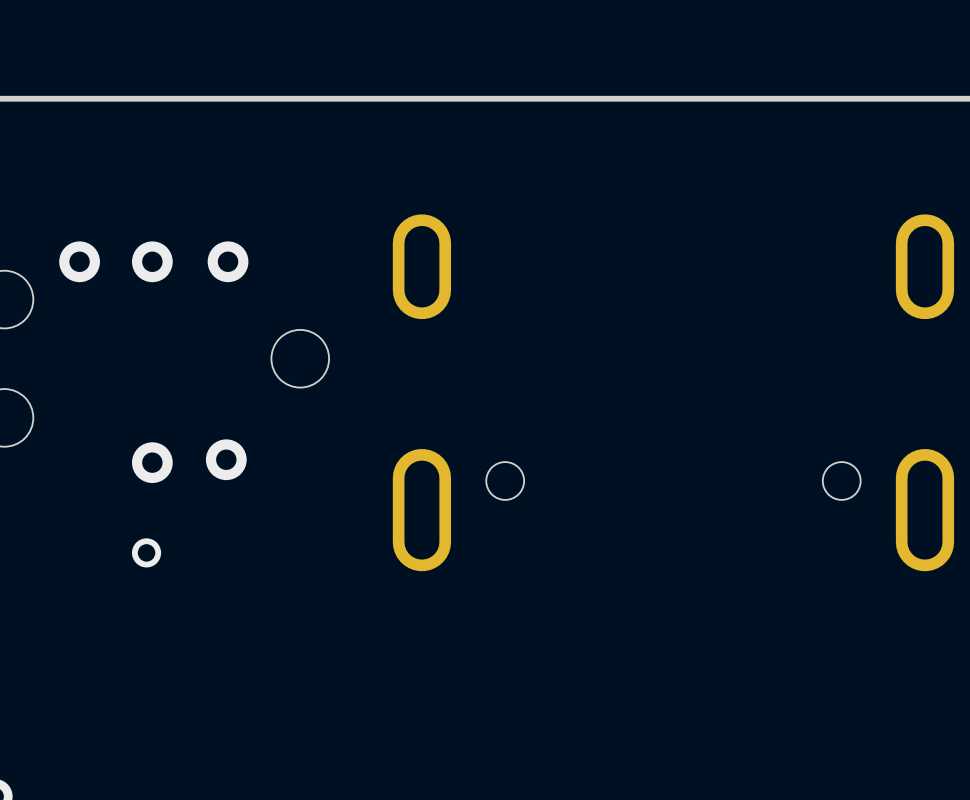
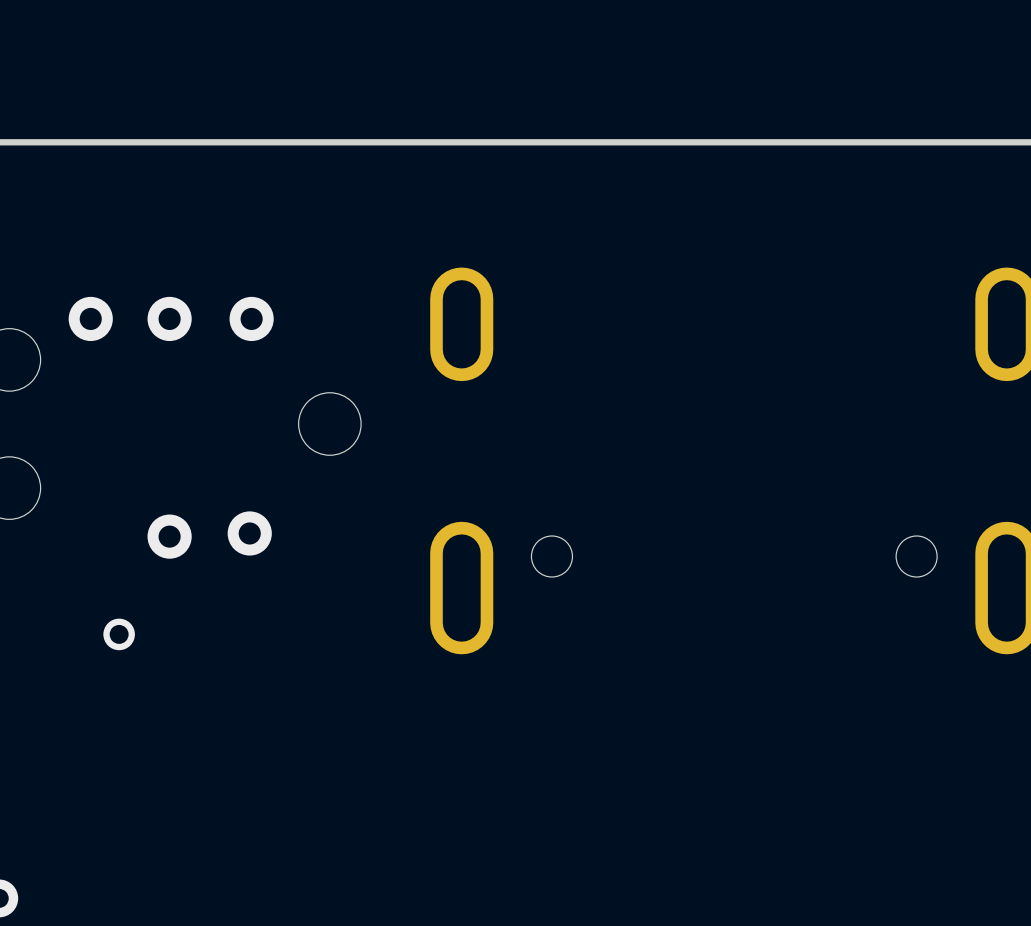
via position: (146, 552) -> (119, 634)

